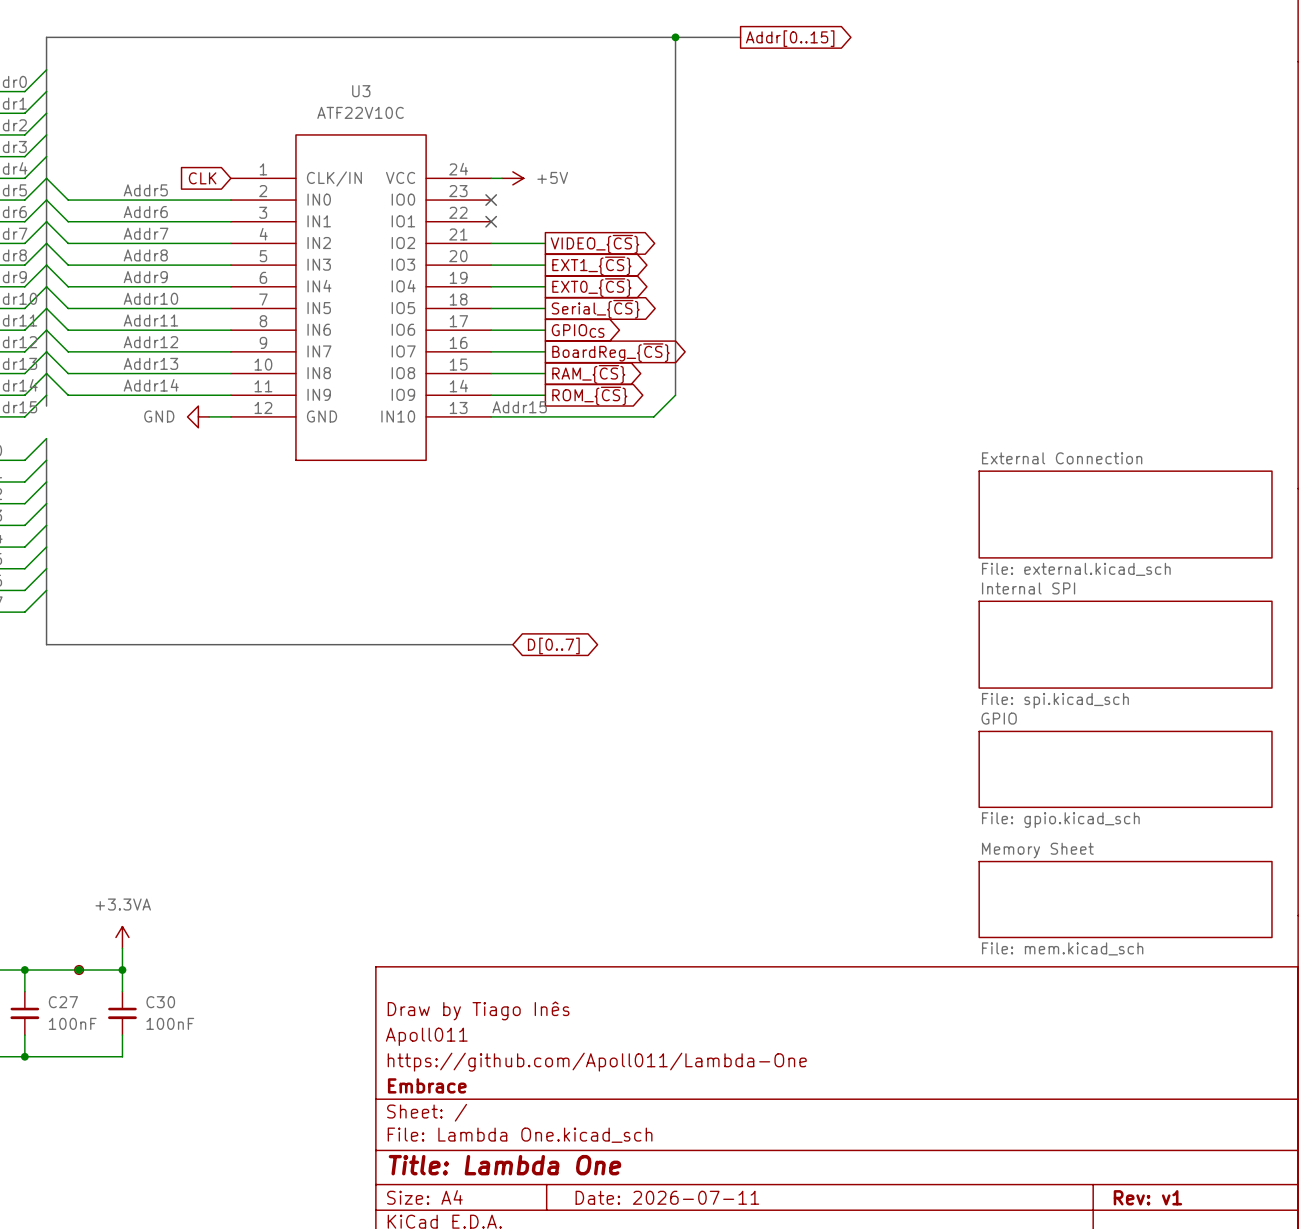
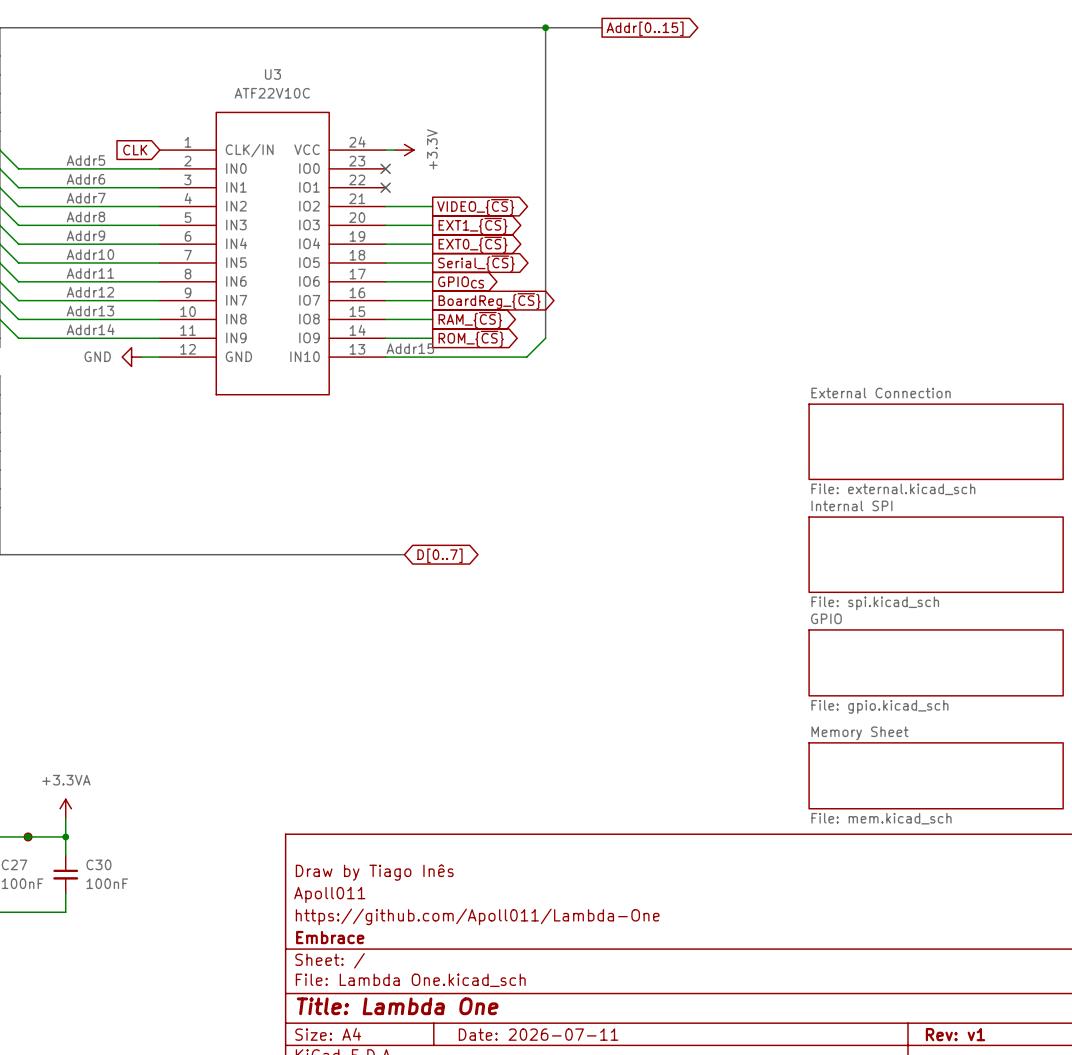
power symbol: +5V (512, 178) -> +3.3V (404, 150)

